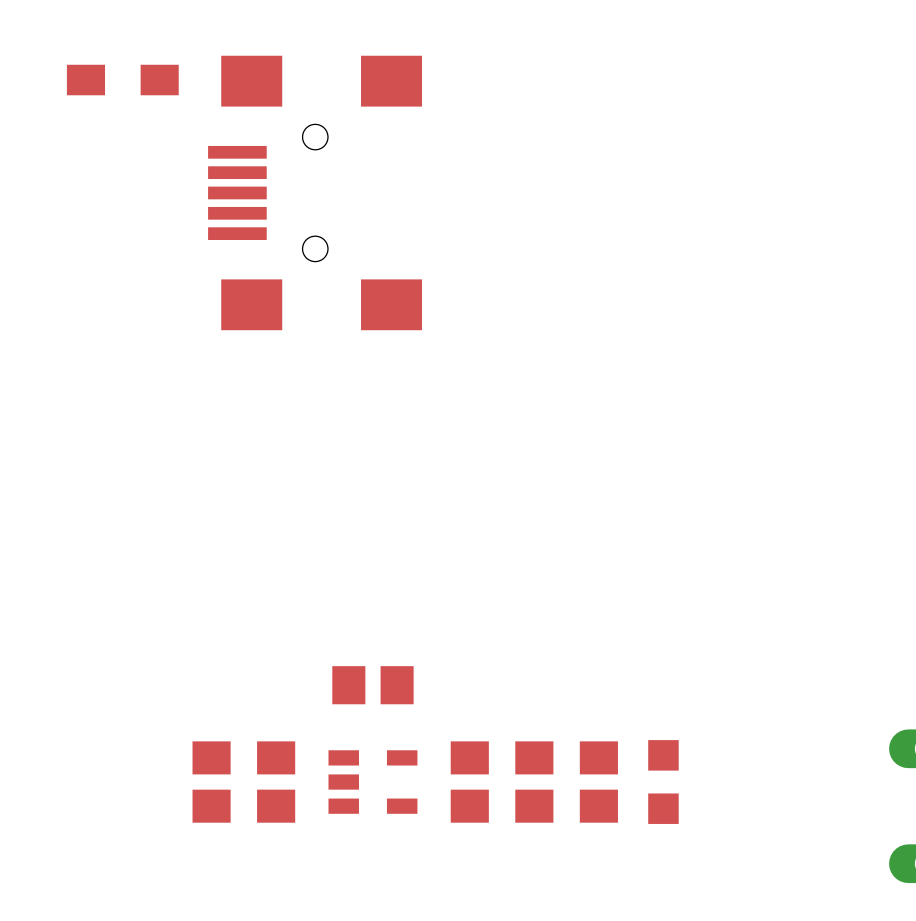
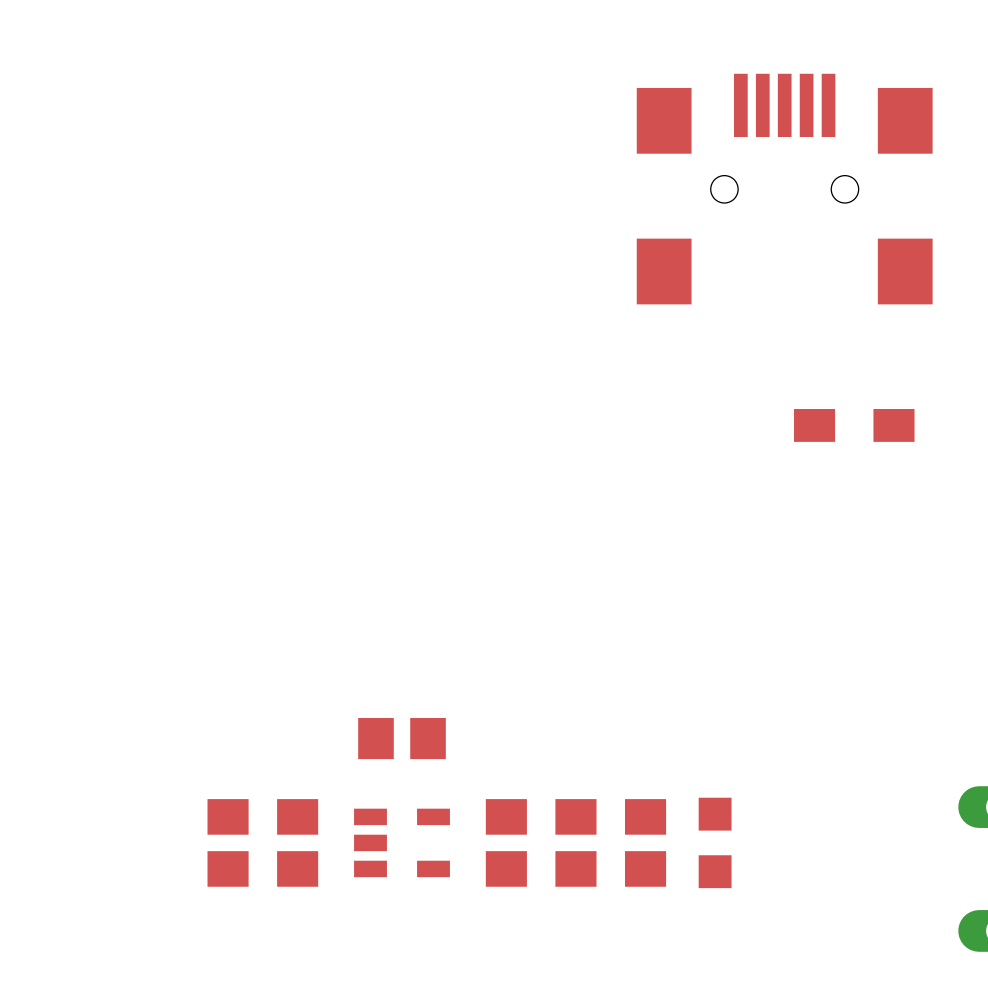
part: (122, 80) -> none
part rotation: 0° (315, 192) -> 90° clockwise (784, 189)
part position: (315, 192) -> (784, 189)
part: none -> (854, 425)

